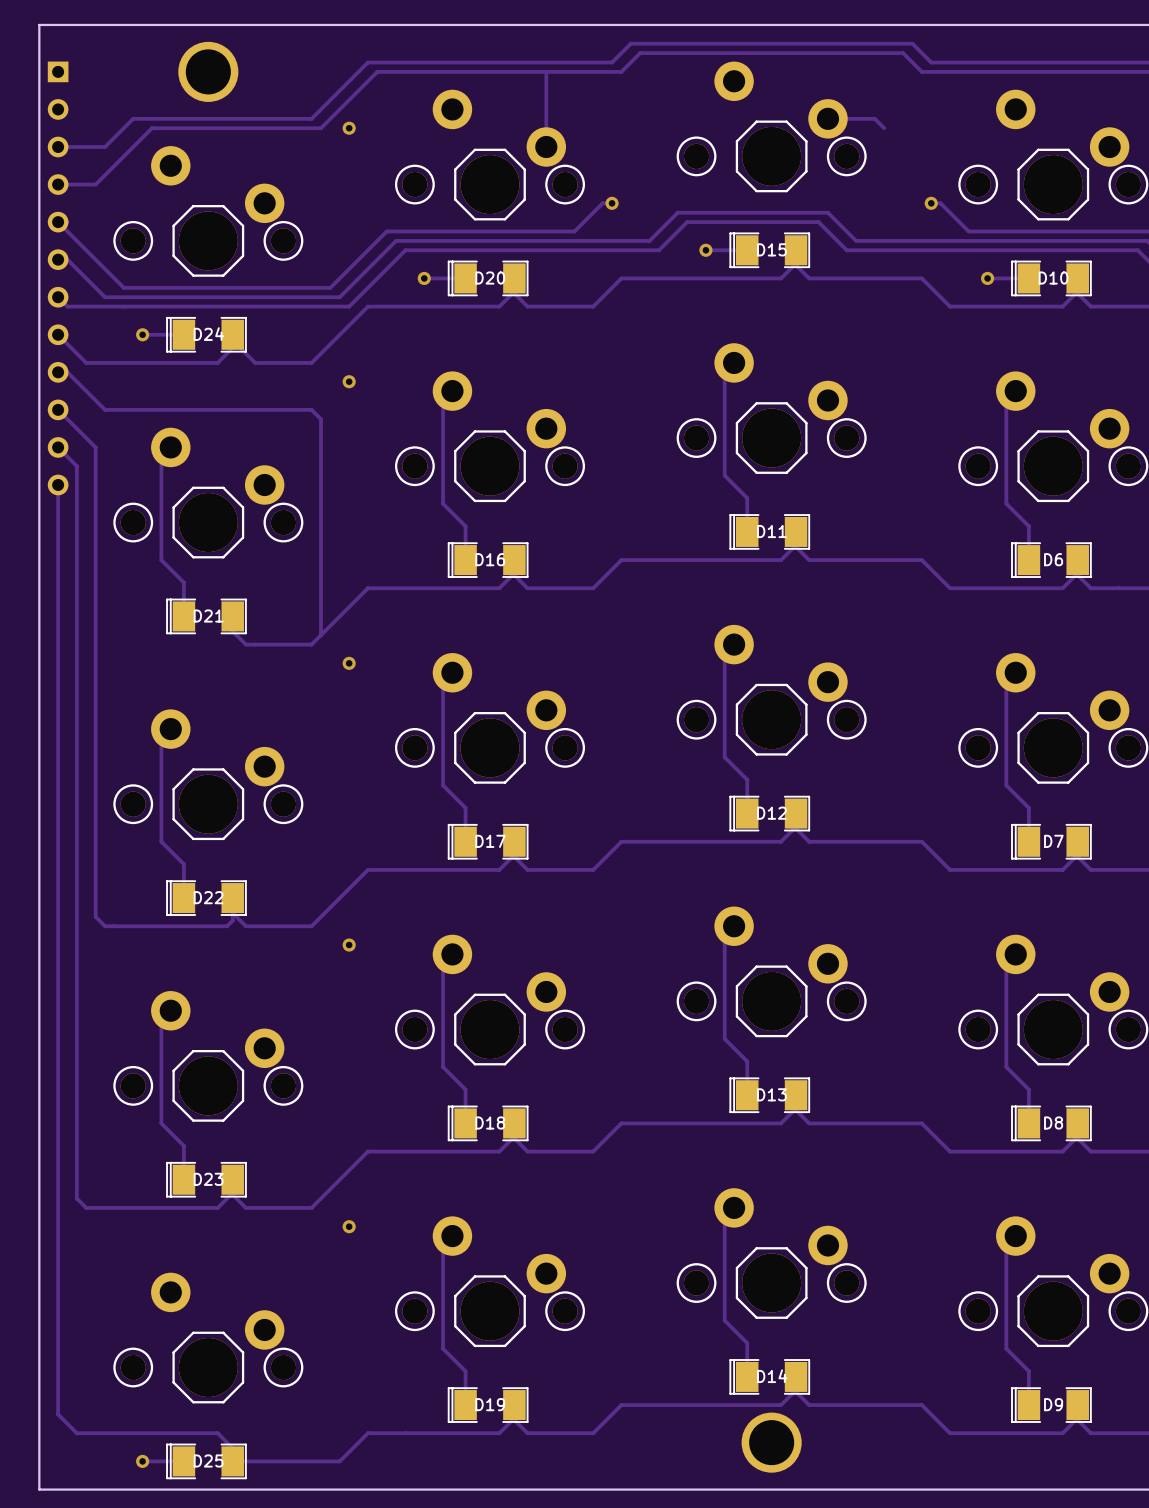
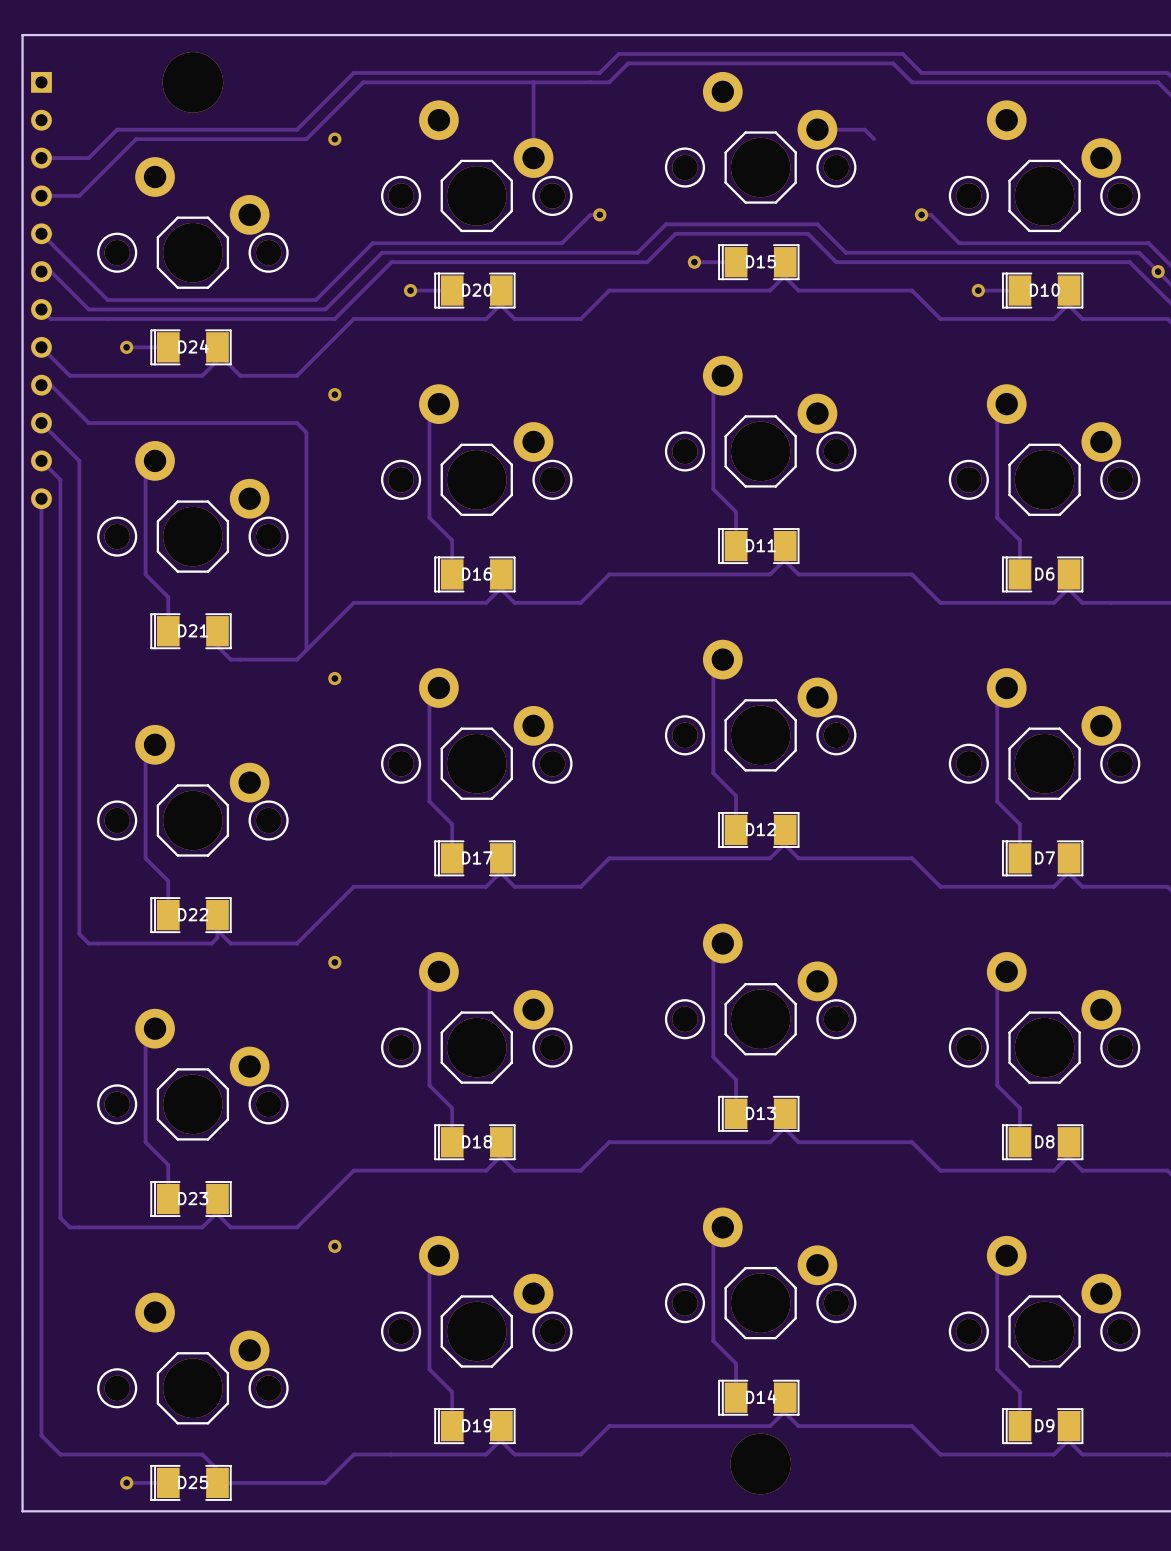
part footprint: [178, 41, 239, 102] -> [162, 52, 224, 113]
part footprint: [741, 1412, 802, 1473] -> [730, 1433, 791, 1495]

